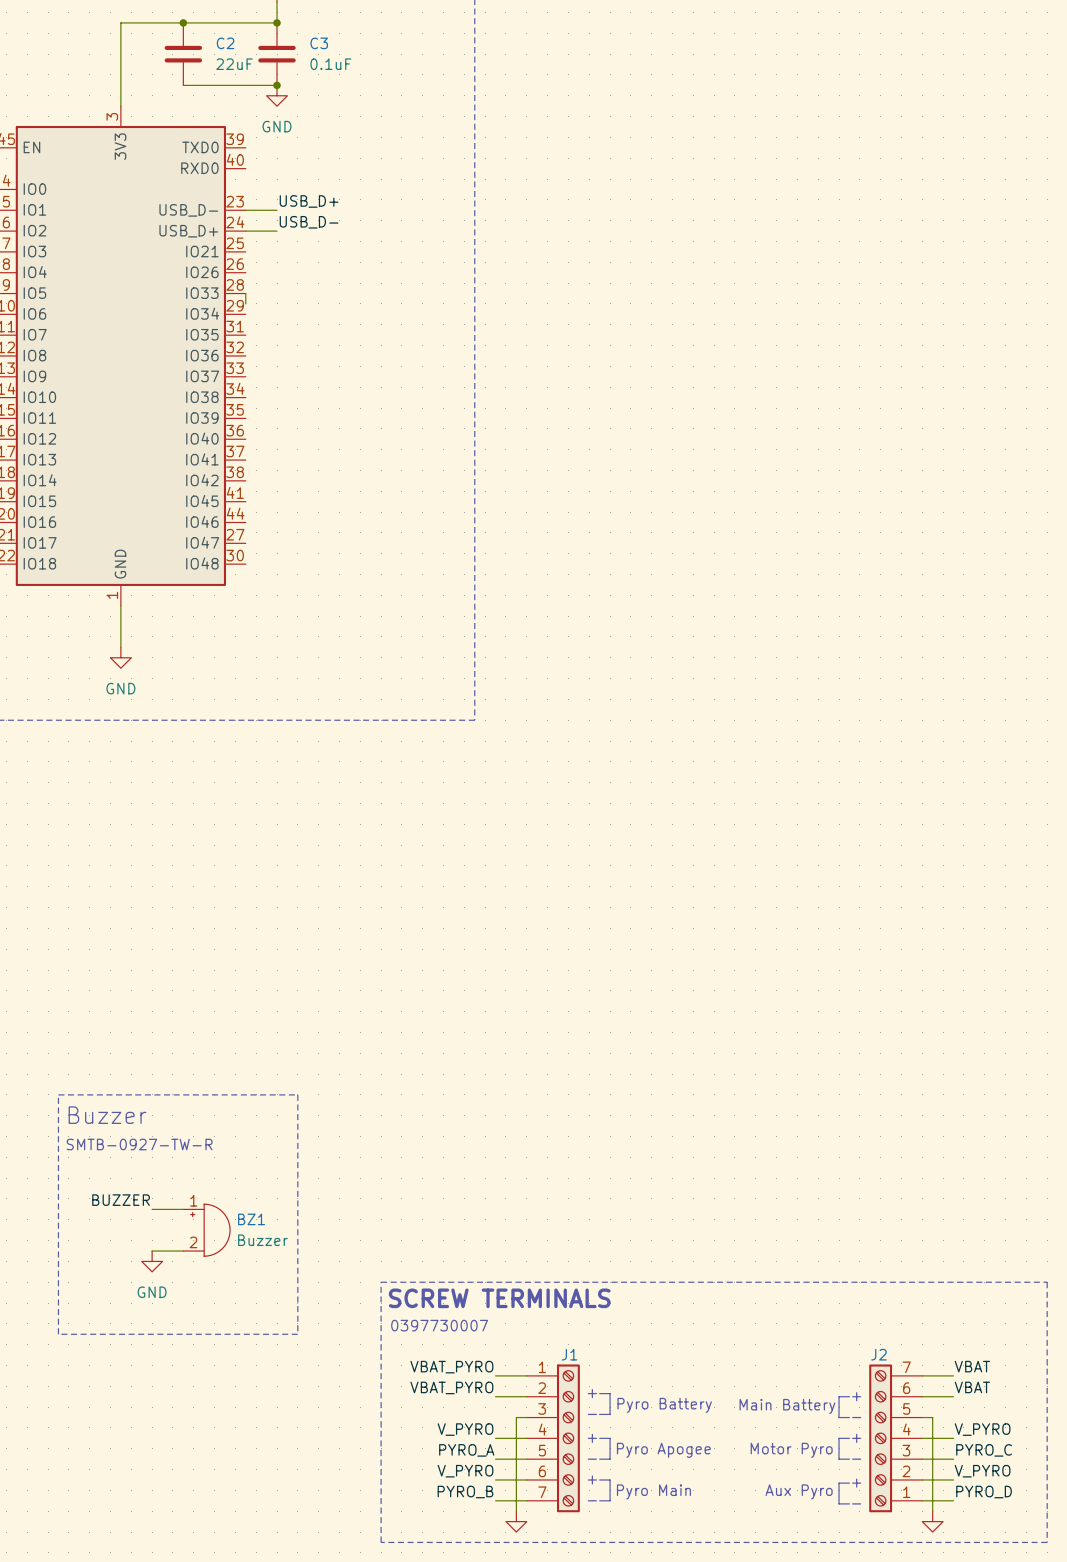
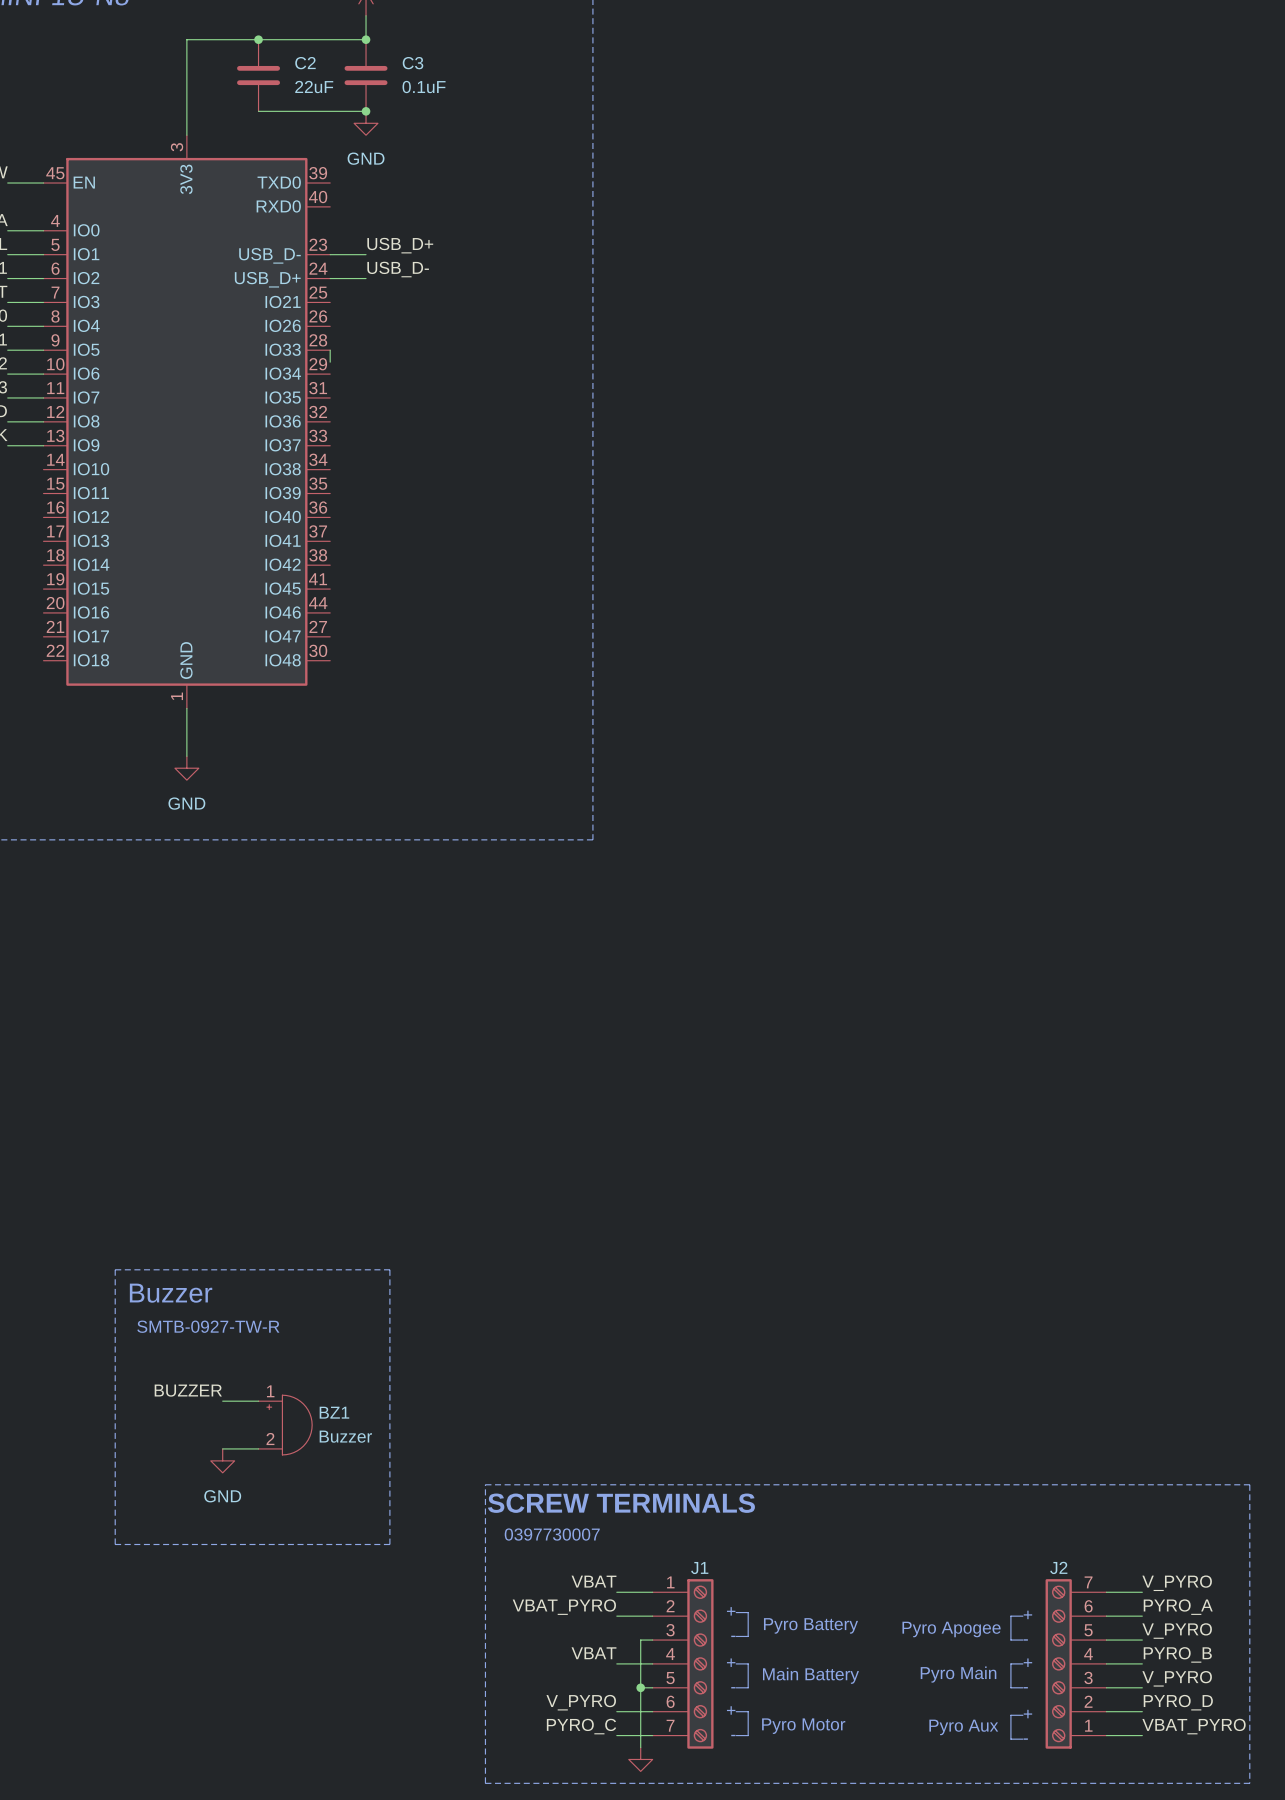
label: VBAT (972, 1366) -> V_PYRO (1177, 1583)
label: VBAT_PYRO (451, 1367) -> VBAT (593, 1581)
label: VBAT (972, 1387) -> PYRO_A (1178, 1607)
text position: Main Battery (787, 1406) -> Main Battery (810, 1675)
label: none -> V_PYRO (1177, 1631)
wire: (932, 1417) (932, 1511) -> (1118, 1640) (1142, 1640)
label: V_PYRO (465, 1429) -> VBAT (593, 1653)
label: V_PYRO (982, 1429) -> PYRO_B (1177, 1654)
label: PYRO_A (466, 1450) -> none
text position: Pyro Apogee (663, 1450) -> Pyro Apogee (951, 1629)
text: Motor Pyro (791, 1450) -> none
label: PYRO_C (984, 1450) -> V_PYRO (1177, 1678)
wire: (495, 1459) (516, 1459) -> none
junction: none -> (640, 1687)
label: V_PYRO (982, 1471) -> PYRO_D (1178, 1702)
text position: Pyro Main (653, 1491) -> Pyro Main (958, 1674)
text: Aux Pyro (799, 1491) -> none
label: PYRO_B (465, 1492) -> PYRO_C (581, 1726)
text: none -> Pyro Motor (803, 1726)
label: PYRO_D (984, 1492) -> VBAT_PYRO (1194, 1726)
text: none -> Pyro Aux (963, 1727)
power symbol: (932, 1521) -> none

